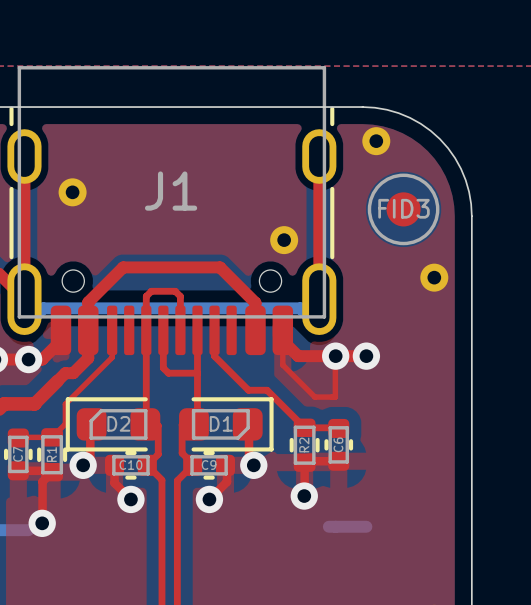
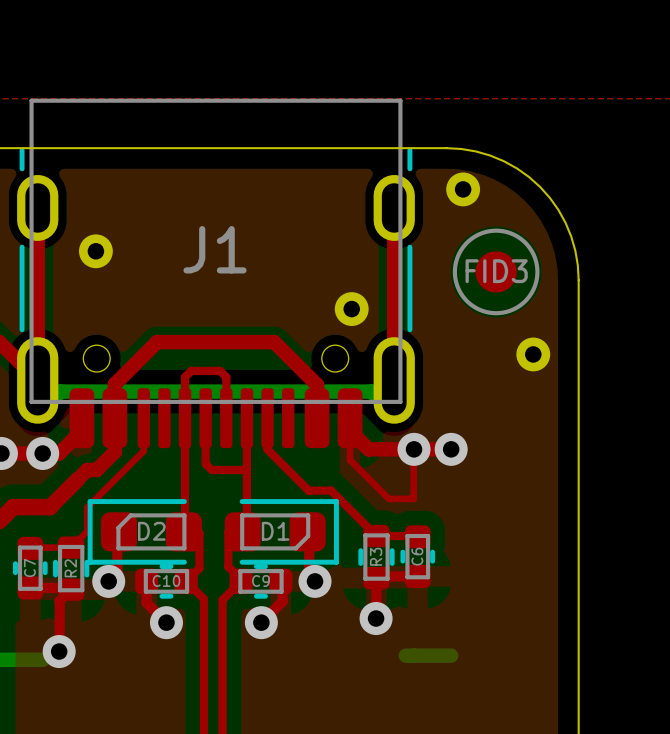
R2 name: R2 (304, 444) -> R3 (376, 556)
R1 name: R1 (51, 454) -> R2 (70, 568)

